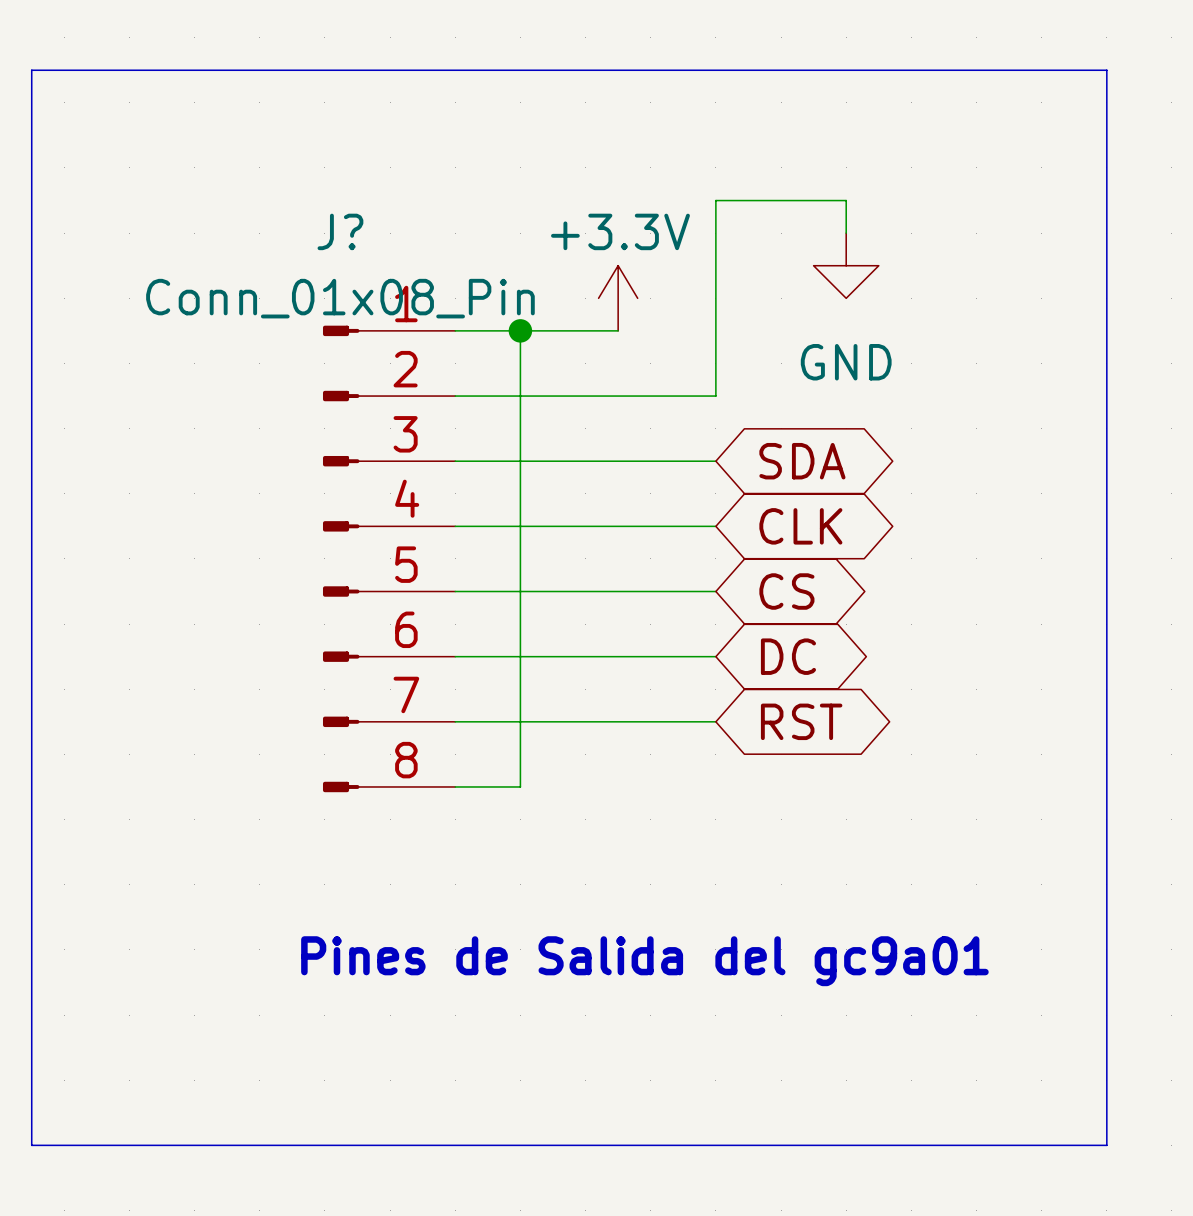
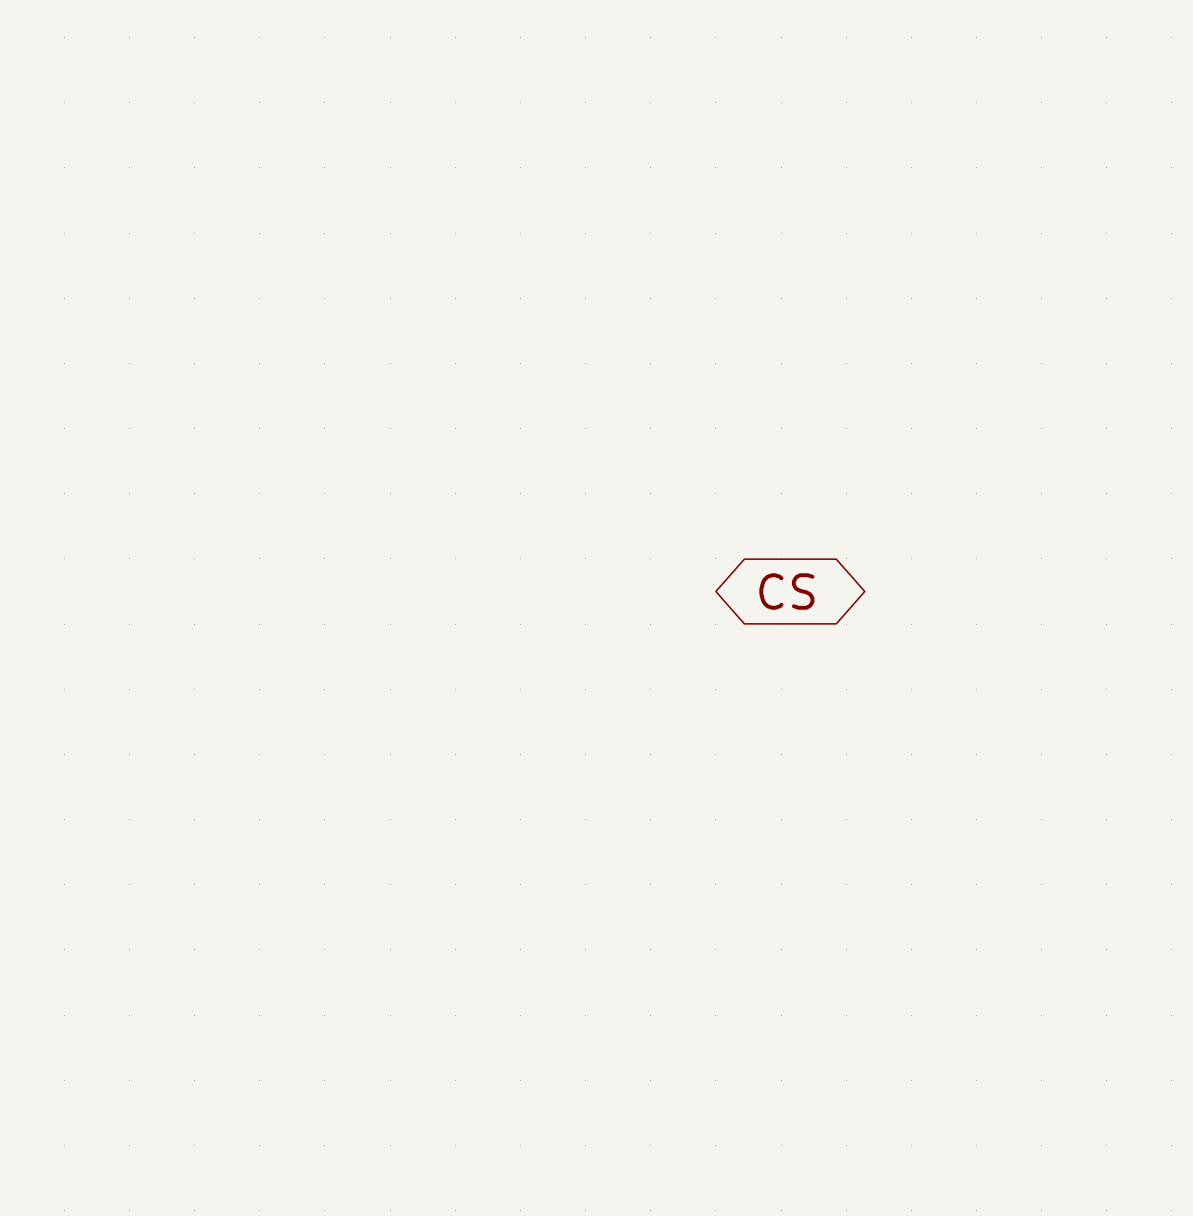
line: (31, 70) (1106, 70) (1106, 1145) (31, 1145) (31, 70) -> none
wire: (846, 233) (846, 200) (715, 200) (715, 396) (455, 396) -> none
power symbol: GND (846, 265) -> none
power symbol: +3.3V (618, 298) -> none
wire: (455, 330) (618, 330) -> none
wire: (520, 330) (520, 786) (455, 786) -> none
junction: (520, 330) -> none
wire: (455, 461) (715, 461) -> none
global label: SDA (802, 461) -> none
wire: (455, 526) (715, 526) -> none
global label: CLK (800, 526) -> none
J?: Conn_01x08_Pin (389, 558) -> none
wire: (455, 591) (715, 591) -> none
wire: (455, 656) (715, 656) -> none
global label: DC (788, 656) -> none
wire: (455, 721) (715, 721) -> none
global label: RST (801, 721) -> none
text: Pines de Salida del gc9a01 (644, 961) -> none

